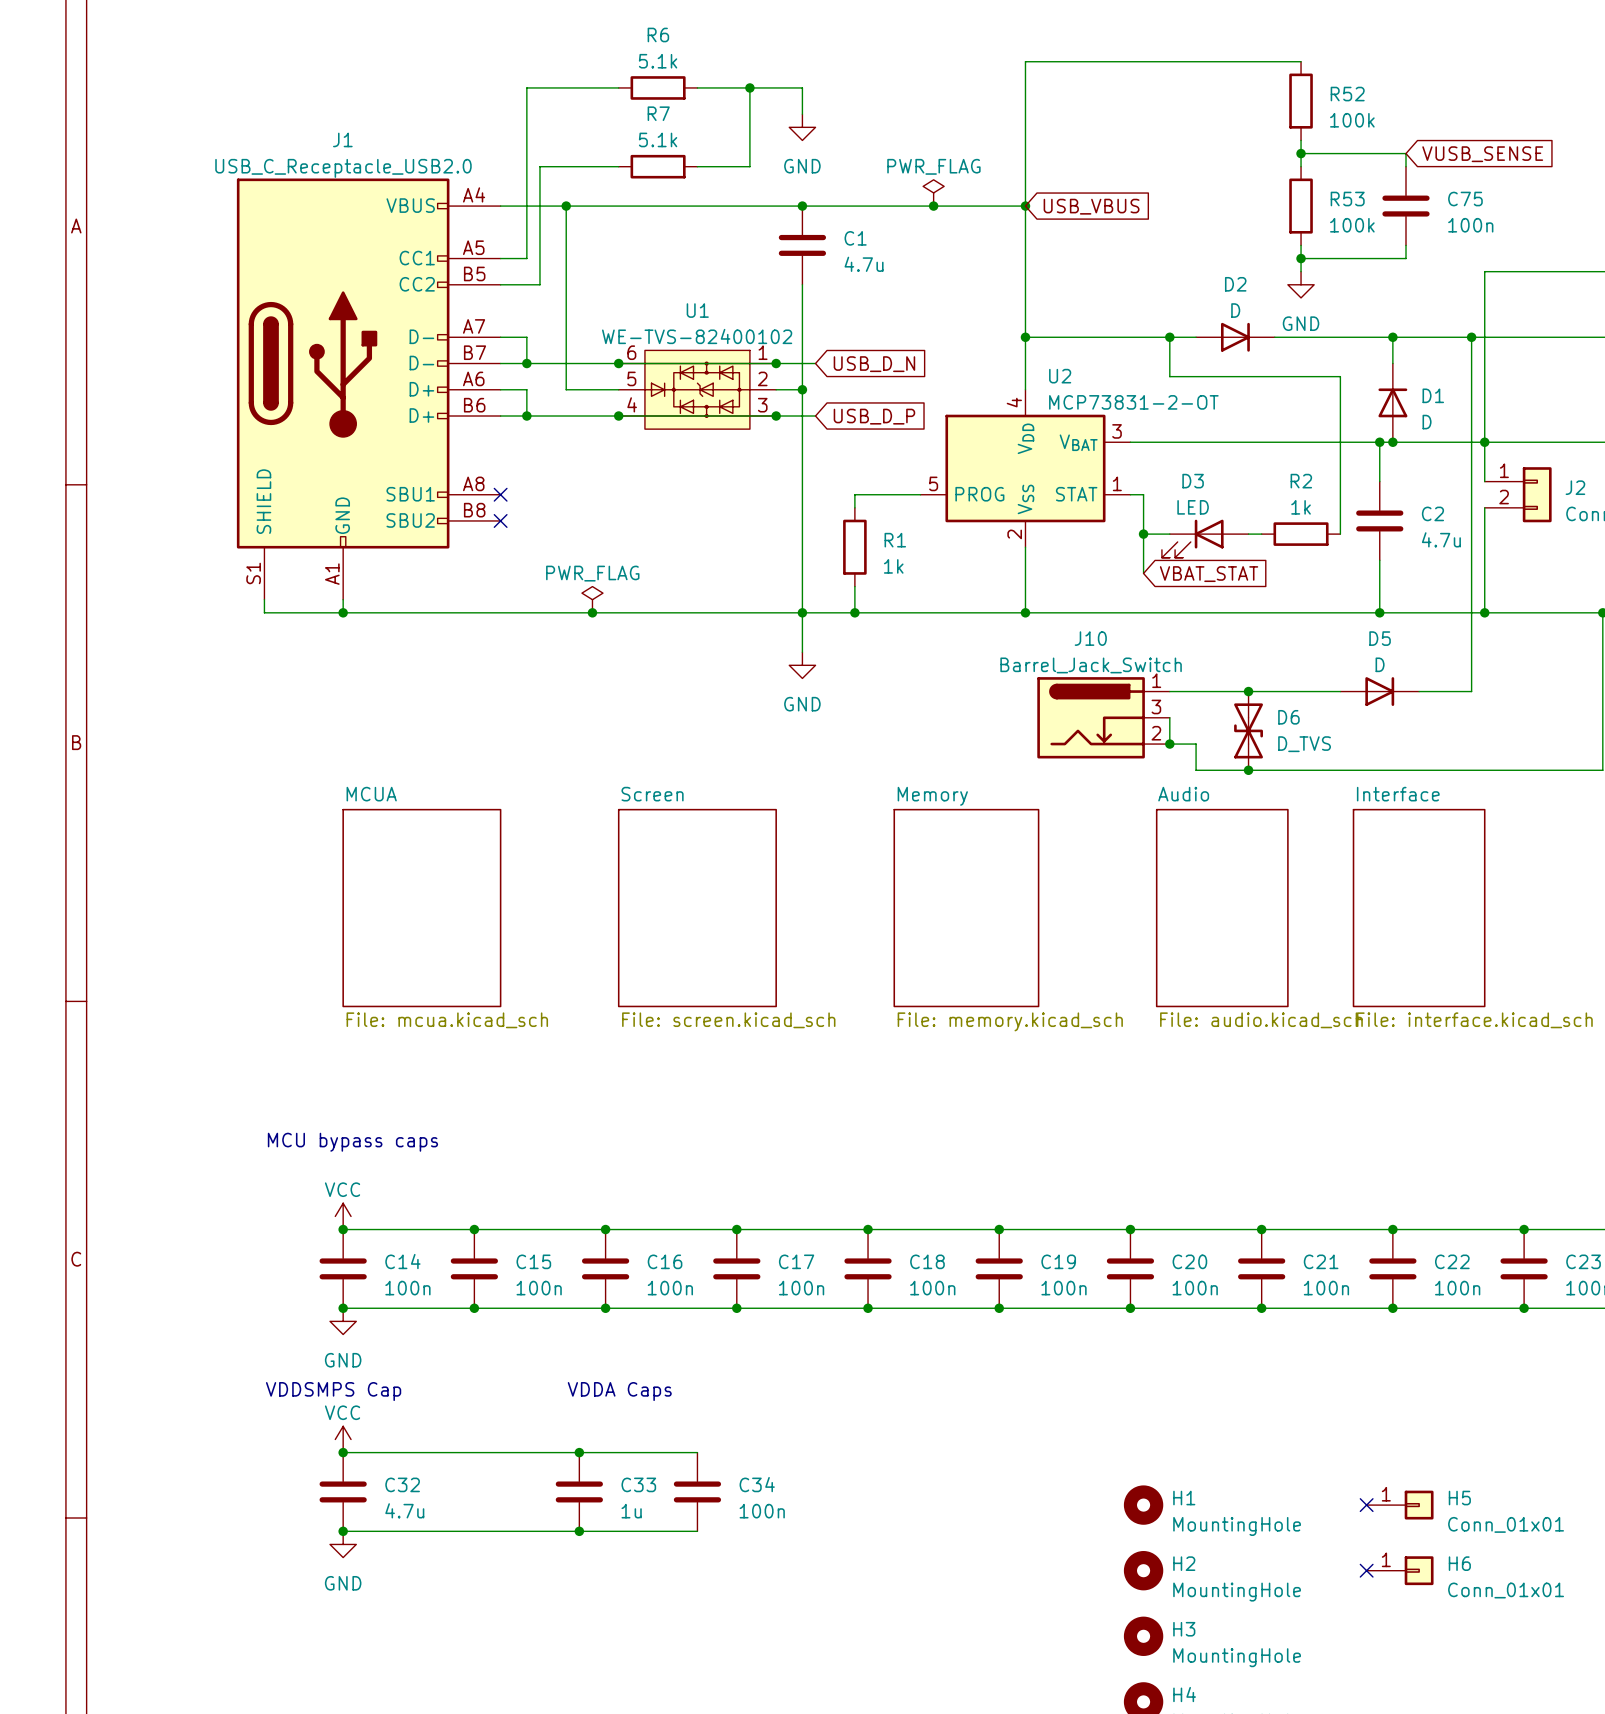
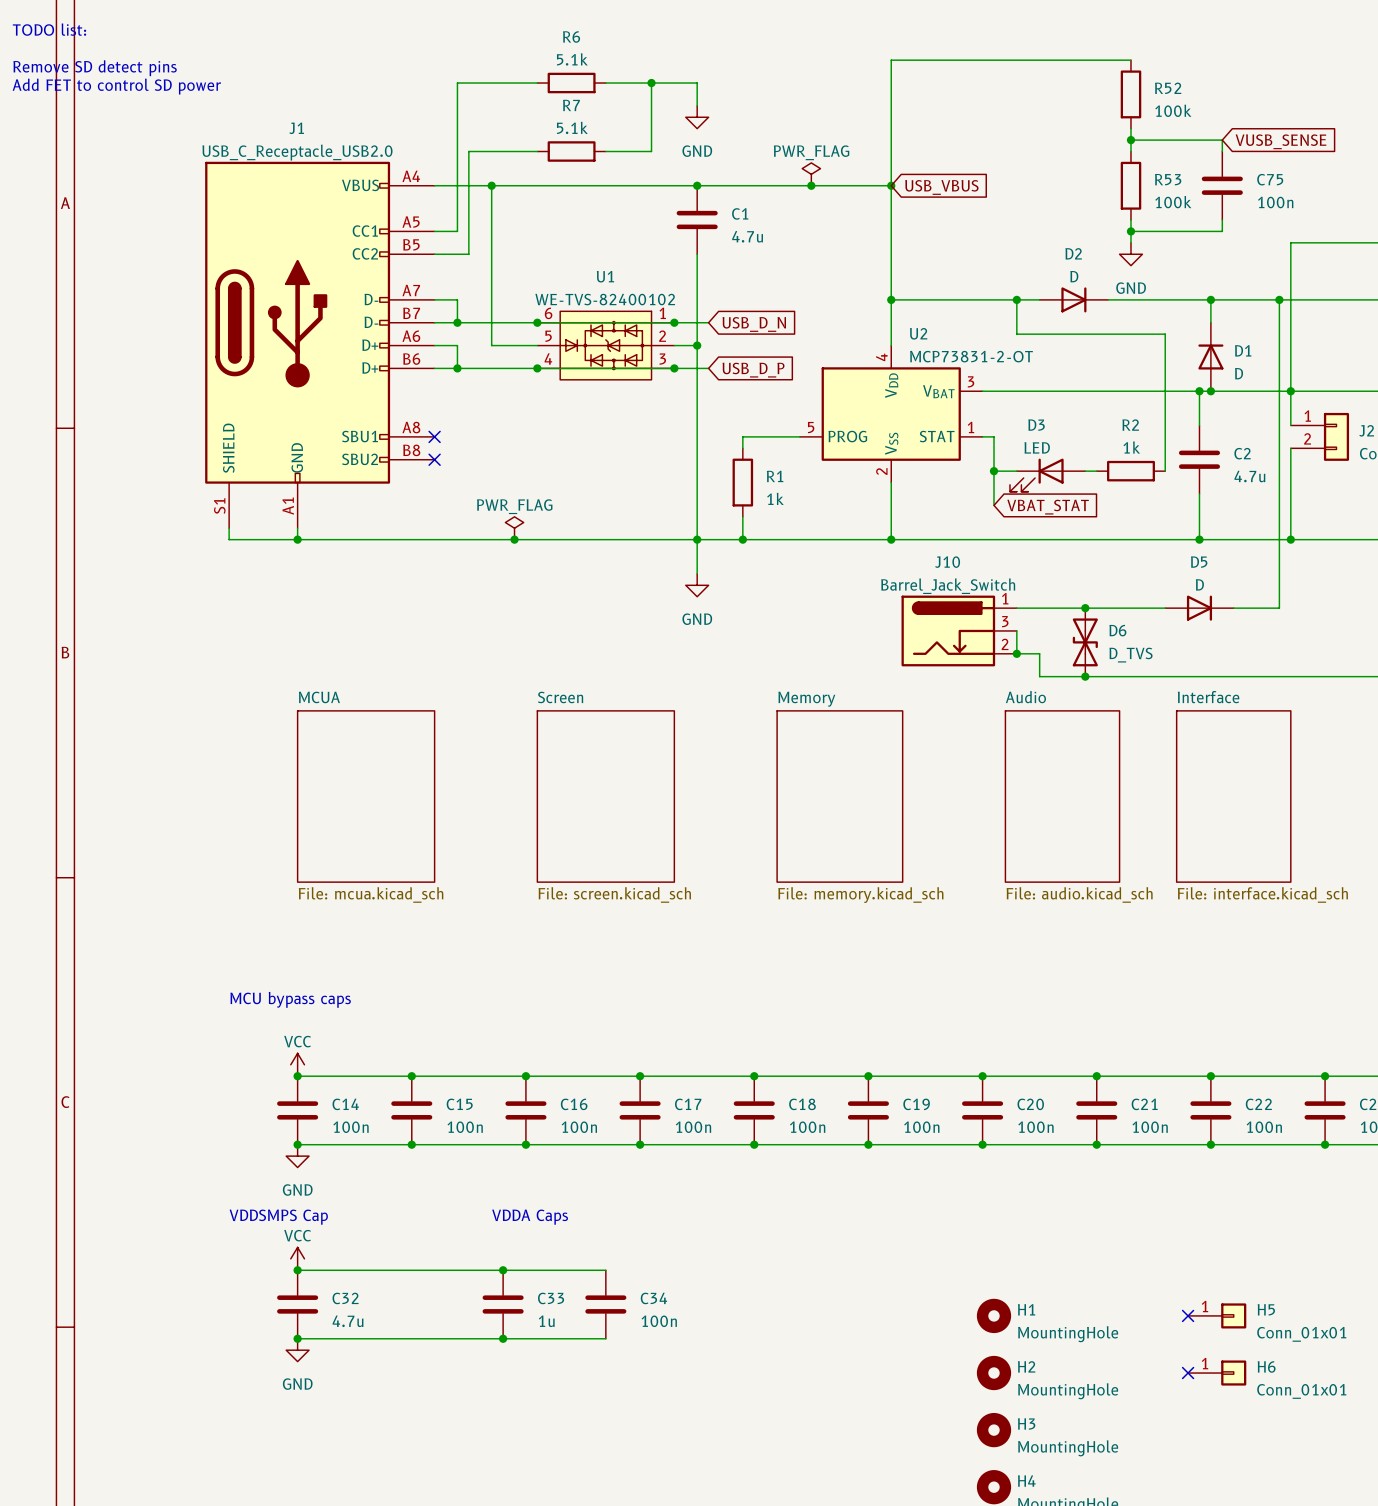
text: none -> TODO list: (49, 29)
text: none -> Remove SD detect pins (95, 68)
text: none -> Add FET to control SD power (116, 86)

